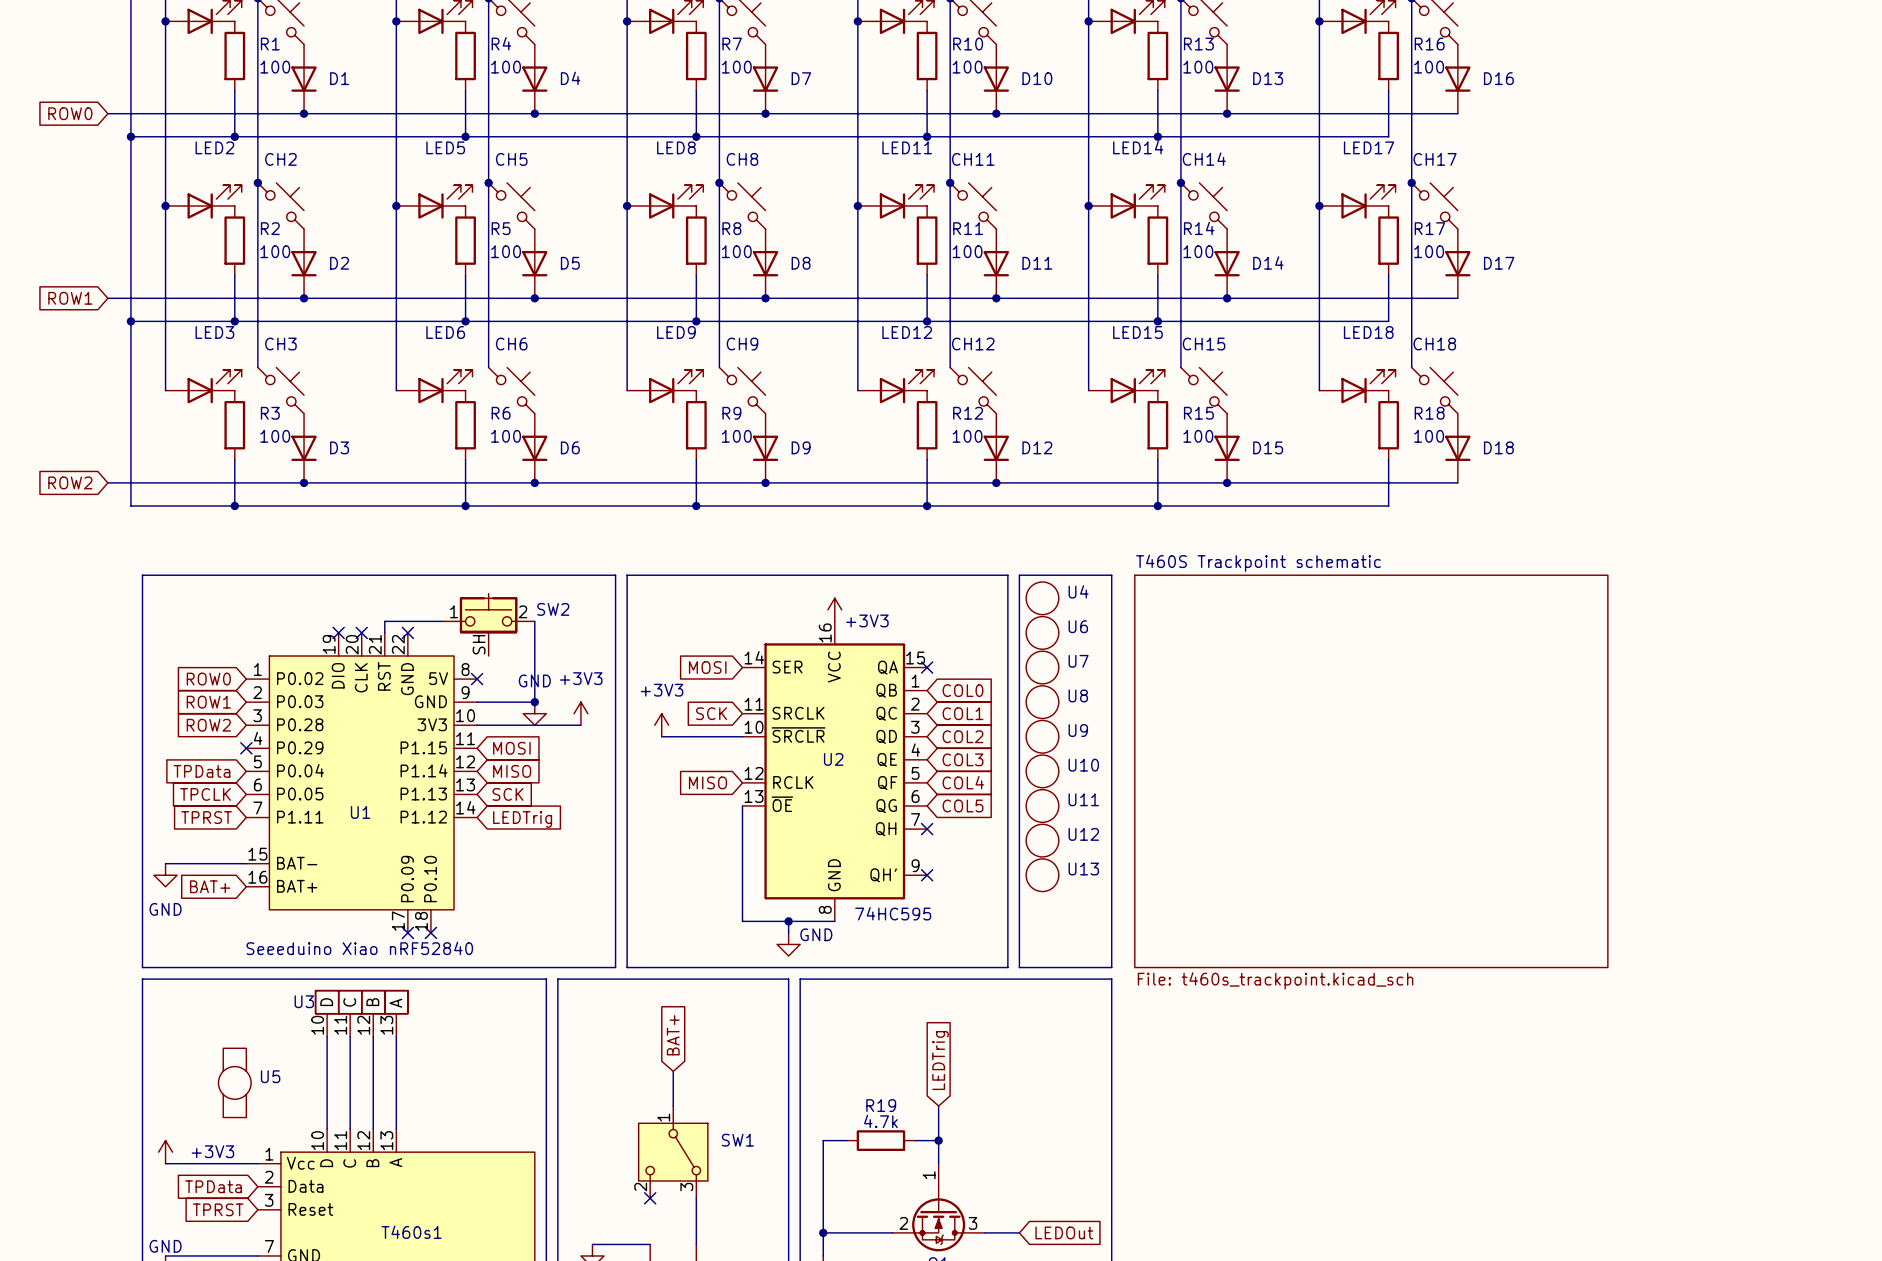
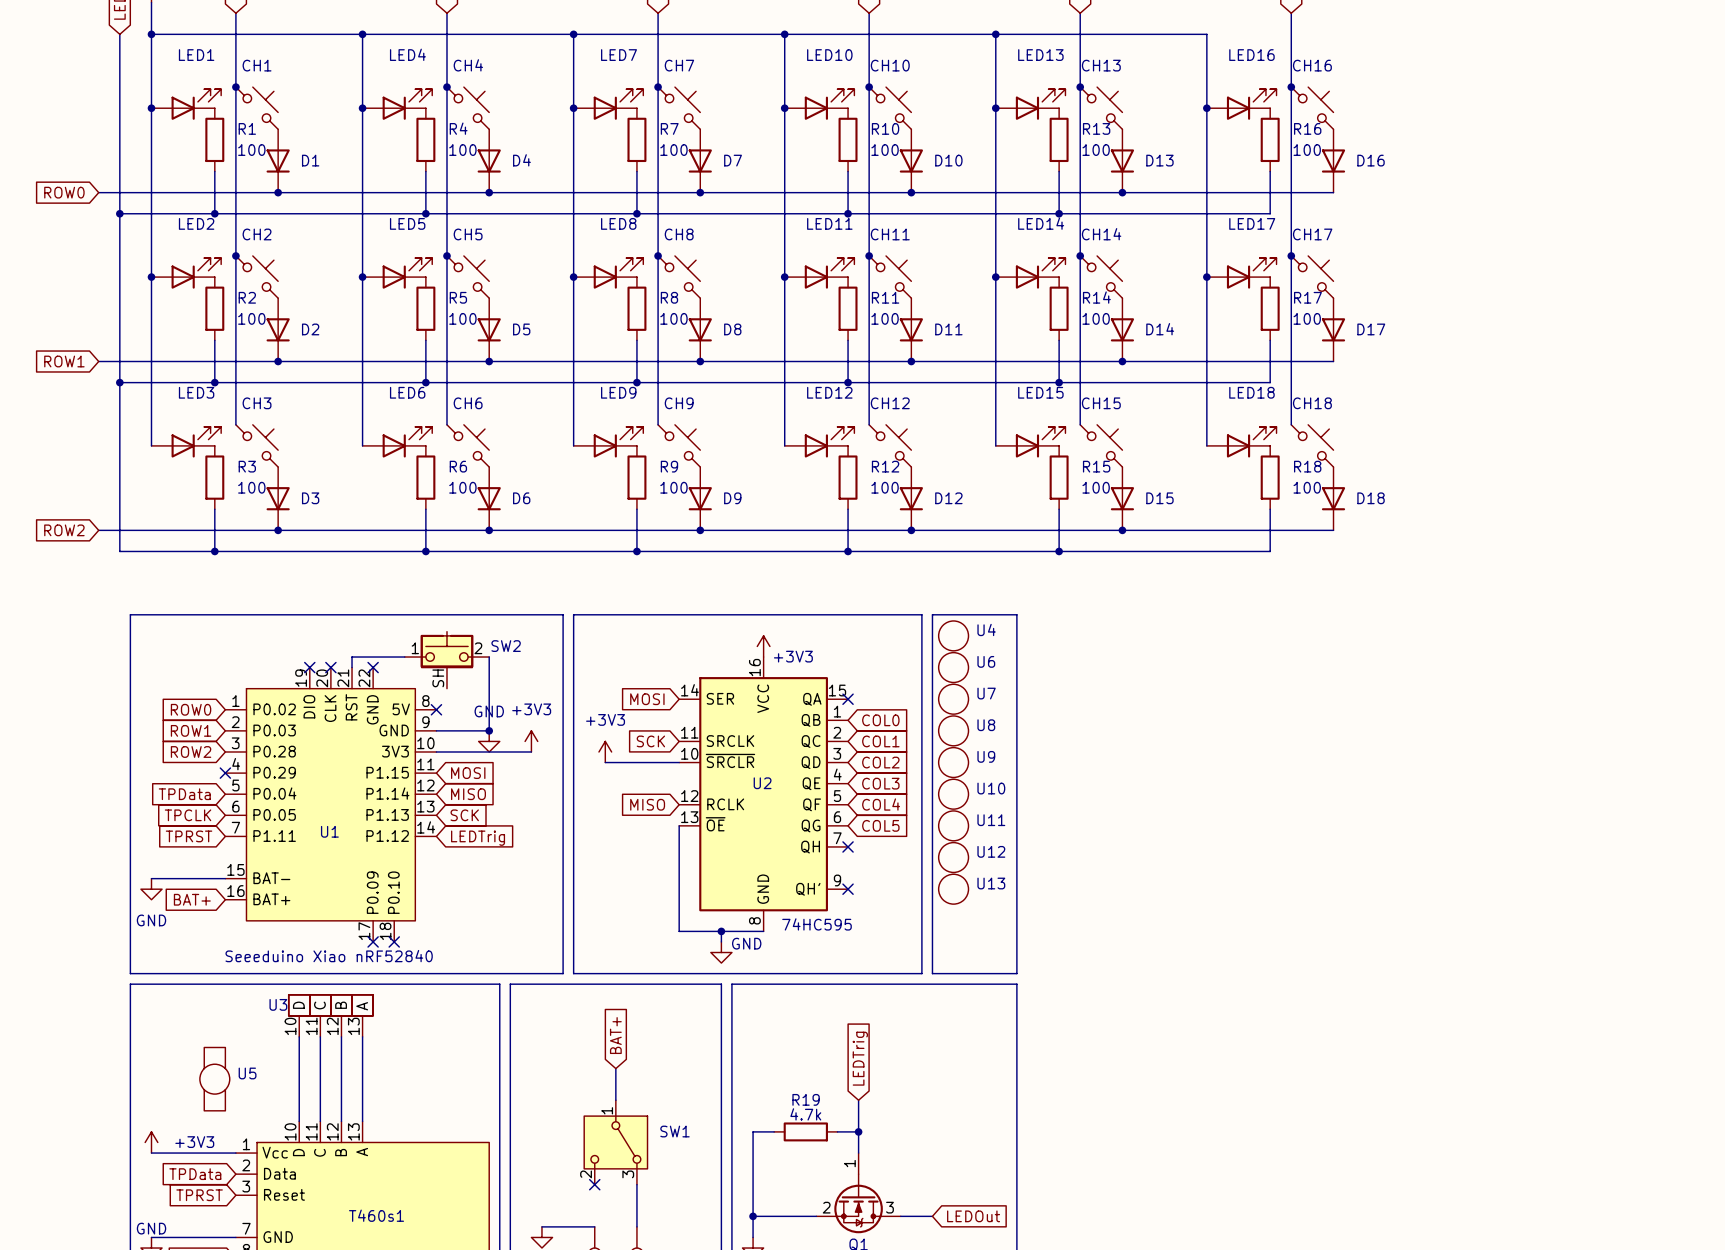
sheet T460S Trackpoint schematic: File: t460s_trackpoint.kicad_sch (1371, 771) -> none

